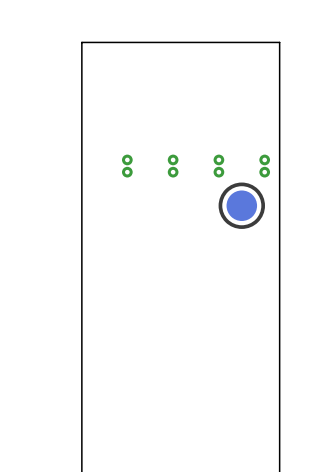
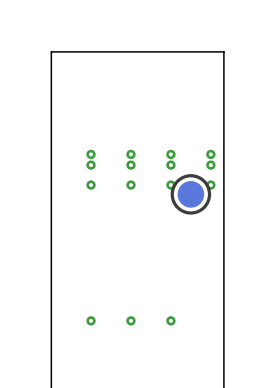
via: none -> (91, 185)
via: none -> (130, 185)
via: none -> (170, 185)
via: none -> (210, 185)
via: none -> (91, 320)
via: none -> (130, 320)
via: none -> (170, 320)

